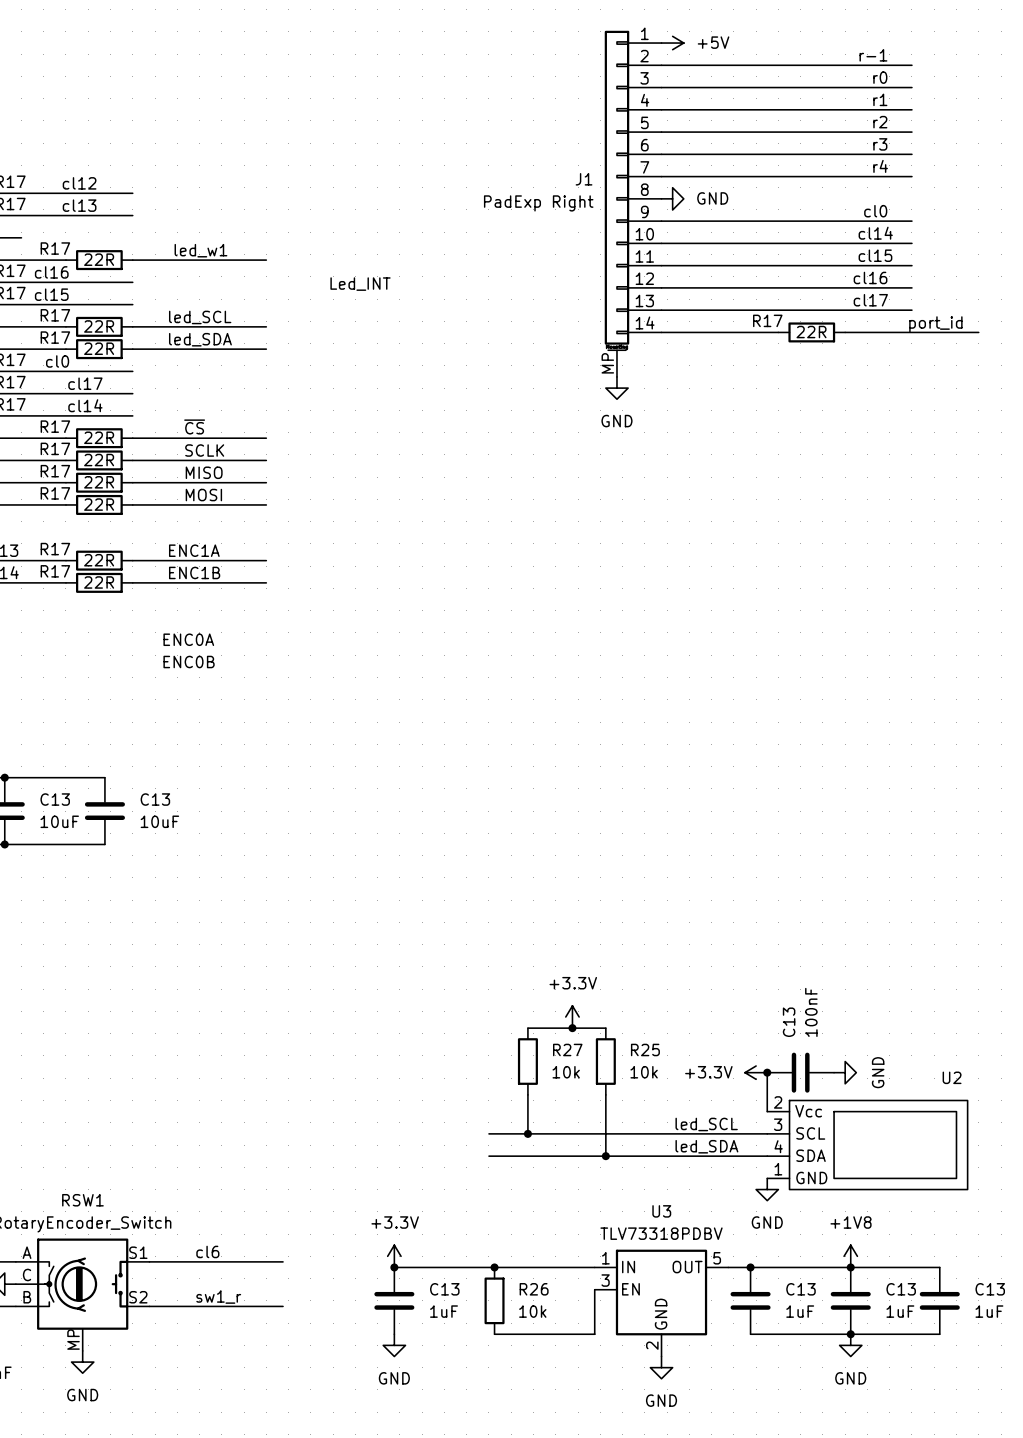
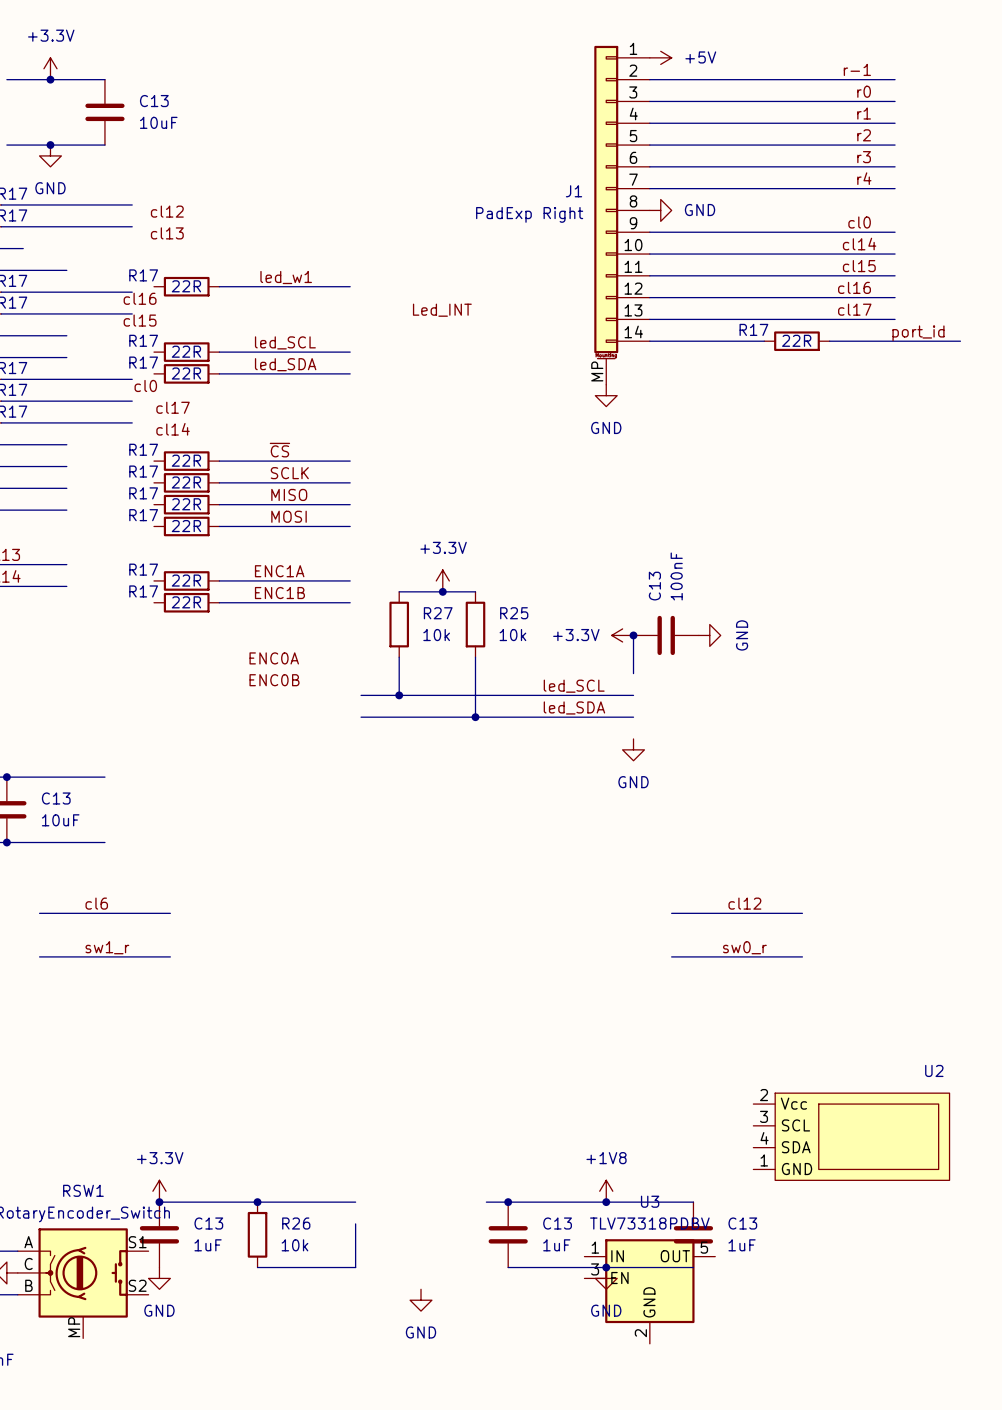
power symbol: none -> +3.3V (50, 68)
wire: none -> (6, 79) (104, 79)
junction: none -> (50, 79)
C13: none -> 10uF (104, 112)
wire: none -> (6, 145) (104, 145)
junction: none -> (50, 145)
power symbol: none -> GND (50, 155)
label position: cl12 (79, 183) -> cl12 (167, 211)
label position: cl13 (79, 205) -> cl13 (167, 233)
label position: led_w1 (200, 250) -> led_w1 (286, 277)
R17: 22R (99, 260) -> none
wire: (132, 260) (266, 260) -> (219, 286) (350, 286)
label position: cl16 (51, 272) -> cl16 (140, 298)
R17: none -> 22R (186, 286)
label position: Led_INT (360, 284) -> Led_INT (442, 310)
label position: cl15 (51, 294) -> cl15 (140, 320)
label position: led_SCL (200, 317) -> led_SCL (285, 342)
R17: 22R (99, 326) -> none
wire: (132, 326) (266, 326) -> (219, 352) (350, 352)
label position: led_SDA (200, 339) -> led_SDA (285, 364)
R17: none -> 22R (186, 352)
R17: 22R (99, 349) -> none
wire: (132, 349) (266, 349) -> (219, 373) (350, 373)
label position: cl0 (57, 361) -> cl0 (145, 385)
R17: none -> 22R (186, 373)
label position: cl17 (85, 383) -> cl17 (173, 407)
label position: cl14 (85, 405) -> cl14 (173, 429)
label position: ~{CS} (194, 426) -> ~{CS} (279, 450)
R17: 22R (99, 438) -> none
wire: (132, 438) (266, 438) -> (219, 461) (350, 461)
label position: SCLK (204, 450) -> SCLK (289, 473)
R17: none -> 22R (186, 461)
R17: 22R (99, 460) -> none
wire: (132, 460) (266, 460) -> (219, 482) (350, 482)
label position: MISO (204, 472) -> MISO (289, 494)
R17: none -> 22R (186, 482)
R17: 22R (99, 482) -> none
wire: (132, 482) (266, 482) -> (219, 504) (350, 504)
label position: MOSI (203, 495) -> MOSI (289, 516)
R17: none -> 22R (186, 504)
R17: 22R (99, 504) -> none
wire: (132, 504) (266, 504) -> (219, 526) (350, 526)
R17: none -> 22R (186, 526)
label position: ENC1A (194, 550) -> ENC1A (279, 571)
R17: 22R (99, 560) -> none
wire: (132, 560) (266, 560) -> (219, 580) (350, 580)
label position: ENC1B (194, 572) -> ENC1B (279, 593)
R17: none -> 22R (186, 580)
power symbol: none -> +3.3V (442, 580)
R17: 22R (99, 582) -> none
wire: (132, 582) (266, 582) -> (219, 602) (350, 602)
wire: none -> (399, 591) (475, 591)
junction: none -> (442, 591)
R17: none -> 22R (186, 602)
power symbol: none -> +3.3V (622, 635)
wire: none -> (633, 635) (633, 673)
junction: none -> (633, 635)
C13: none -> 100nF (666, 635)
power symbol: none -> GND (709, 635)
label position: ENC0A (188, 639) -> ENC0A (274, 658)
wire: none -> (399, 657) (399, 695)
wire: none -> (475, 657) (475, 717)
label position: ENC0B (189, 662) -> ENC0B (274, 680)
label: none -> led_SCL (574, 686)
wire: none -> (361, 695) (633, 695)
junction: none -> (399, 695)
label: none -> led_SDA (574, 707)
wire: none -> (361, 717) (633, 717)
junction: none -> (475, 717)
power symbol: none -> GND (633, 749)
C13: 10uF (104, 811) -> none
label: none -> cl6 (96, 903)
label: none -> cl12 (744, 903)
wire: none -> (39, 913) (170, 913)
wire: none -> (671, 913) (802, 913)
label: none -> sw1_r (107, 947)
label: none -> sw0_r (744, 947)
wire: none -> (39, 956) (170, 956)
wire: none -> (671, 956) (802, 956)
power symbol: +3.3V (572, 1017) -> none
wire: (527, 1028) (605, 1028) -> none
junction: (572, 1028) -> none
R27 position: (527, 1061) -> (399, 624)
R25 position: (605, 1061) -> (475, 624)
power symbol: +3.3V (756, 1072) -> none
wire: (767, 1072) (767, 1111) -> none
junction: (767, 1072) -> none
C13: 100nF (800, 1072) -> none
power symbol: GND (845, 1072) -> none
wire: (527, 1094) (527, 1133) -> none
wire: (605, 1094) (605, 1156) -> none
label: led_SCL (706, 1124) -> none
wire: (488, 1133) (767, 1133) -> none
junction: (527, 1133) -> none
label: led_SDA (706, 1146) -> none
wire: (488, 1156) (767, 1156) -> none
junction: (605, 1156) -> none
power symbol: GND (767, 1189) -> none
power symbol: none -> +3.3V (159, 1191)
power symbol: none -> +1V8 (606, 1191)
wire: none -> (159, 1202) (355, 1202)
junction: none -> (159, 1202)
junction: none -> (257, 1202)
wire: none -> (486, 1202) (693, 1202)
junction: none -> (508, 1202)
junction: none -> (606, 1202)
wire: none -> (355, 1223) (355, 1267) (257, 1267)
C13: none -> 1uF (159, 1234)
R26: none -> 10k (257, 1234)
C13: none -> 1uF (508, 1234)
label: cl6 (207, 1251) -> none
power symbol: +3.3V (394, 1256) -> none
power symbol: +1V8 (850, 1256) -> none
wire: (149, 1261) (283, 1261) -> none
wire: (394, 1267) (594, 1267) -> none
junction: (394, 1267) -> none
junction: (494, 1267) -> none
wire: (728, 1267) (939, 1267) -> none
junction: (750, 1267) -> none
junction: (850, 1267) -> none
wire: none -> (508, 1267) (693, 1267)
junction: none -> (606, 1267)
wire: (594, 1289) (594, 1334) (494, 1334) -> none
label: sw1_r (218, 1297) -> none
C13: 1uF (394, 1300) -> none
R26: 10k (494, 1300) -> none
C13 position: (750, 1300) -> (693, 1234)
C13: 1uF (850, 1300) -> none
C13: 1uF (939, 1300) -> none
wire: (149, 1306) (283, 1306) -> none
wire: (750, 1334) (939, 1334) -> none
junction: (850, 1334) -> none
power symbol position: GND (394, 1345) -> GND (421, 1300)
power symbol: GND (850, 1345) -> none
power symbol position: GND (82, 1362) -> GND (159, 1278)
power symbol position: GND (661, 1367) -> GND (606, 1278)

